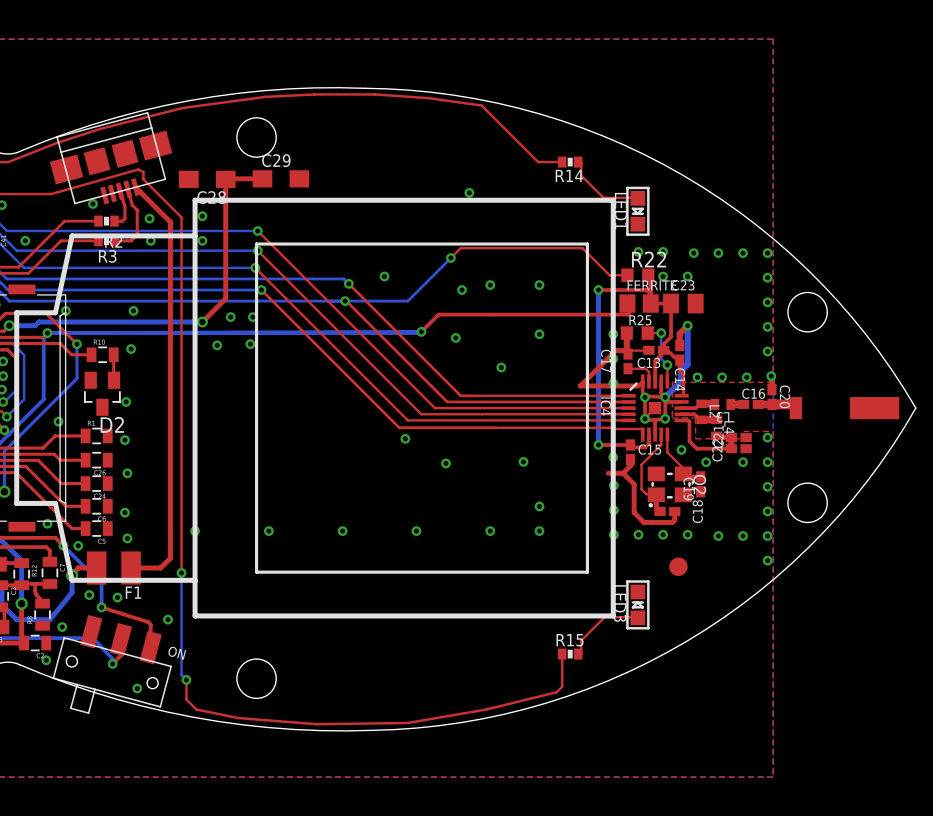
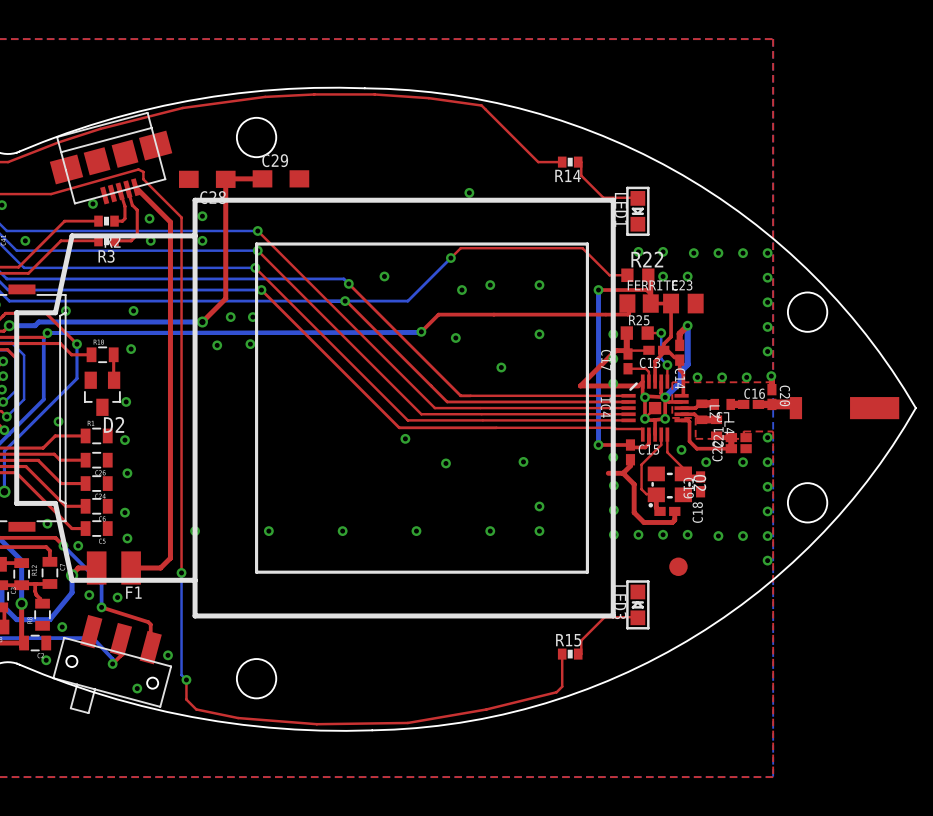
via position: (168, 619) -> (168, 655)
text: ON (177, 653) -> none

